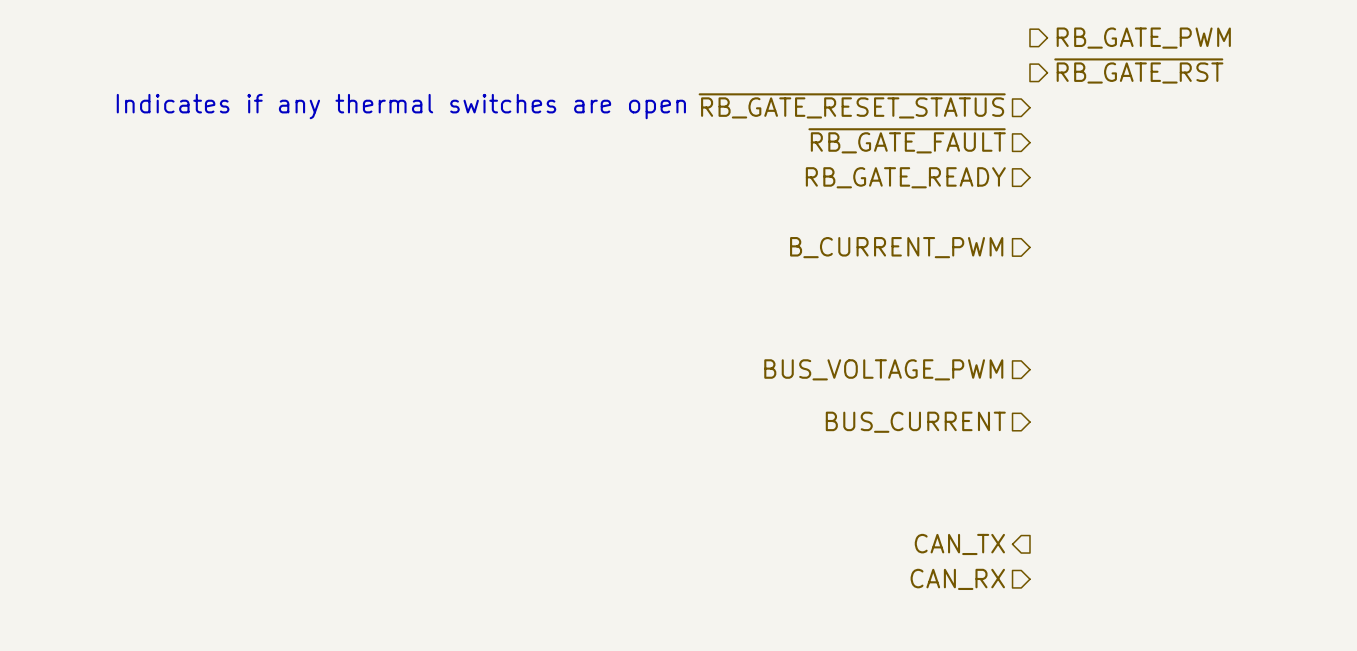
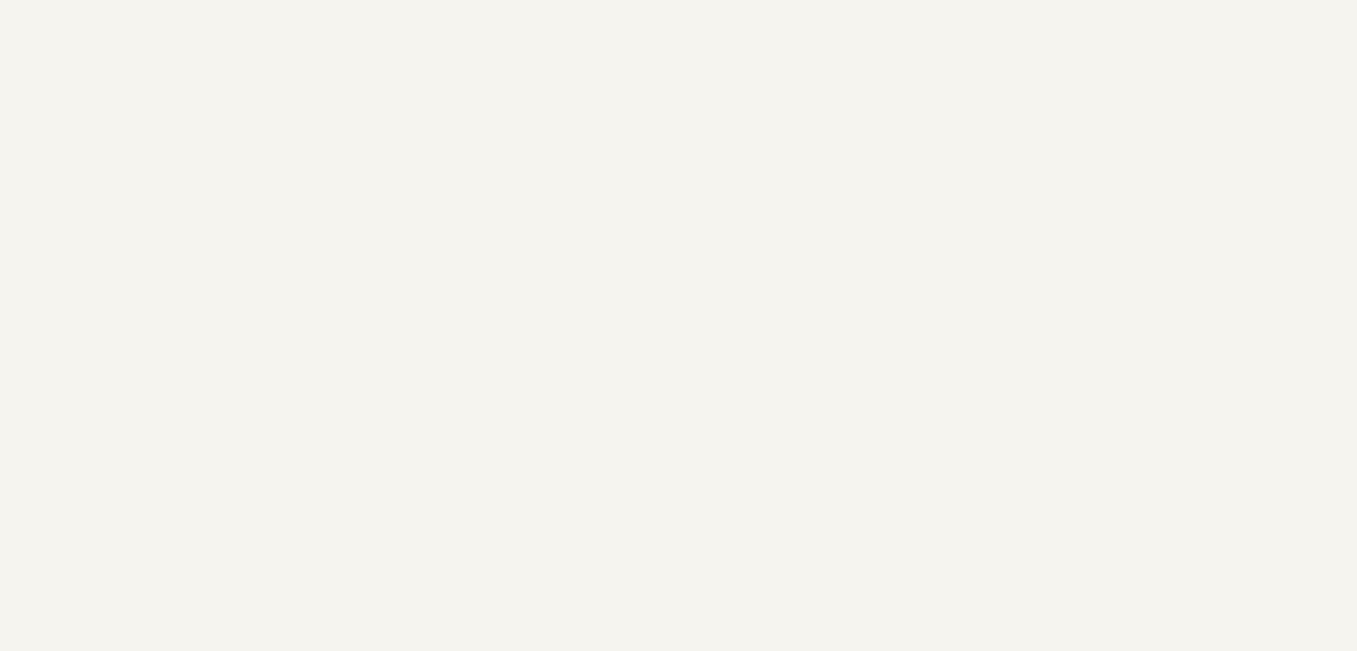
hierarchical label: RB_GATE_PWM (1143, 38) -> none
hierarchical label: ~{RB_GATE_RST} (1138, 70) -> none
hierarchical label: ~{RB_GATE_RESET_STATUS} (852, 105) -> none
text: Indicates if any thermal switches are open (401, 106) -> none
hierarchical label: ~{RB_GATE_FAULT} (907, 140) -> none
hierarchical label: RB_GATE_READY (905, 177) -> none
hierarchical label: B_CURRENT_PWM (896, 247) -> none
hierarchical label: BUS_VOLTAGE_PWM (883, 369) -> none
hierarchical label: BUS_CURRENT (915, 422) -> none
hierarchical label: CAN_TX (959, 544) -> none
hierarchical label: CAN_RX (957, 579) -> none

